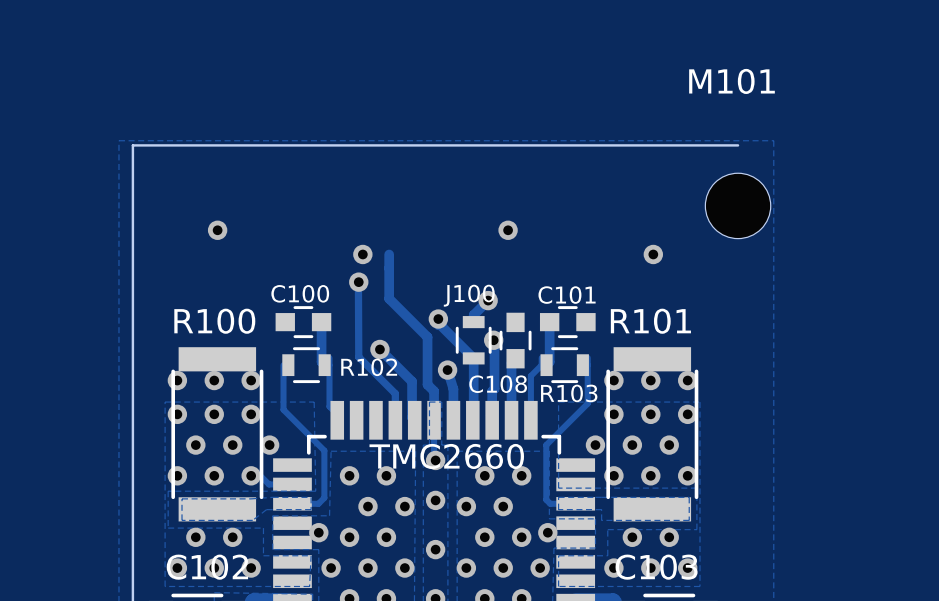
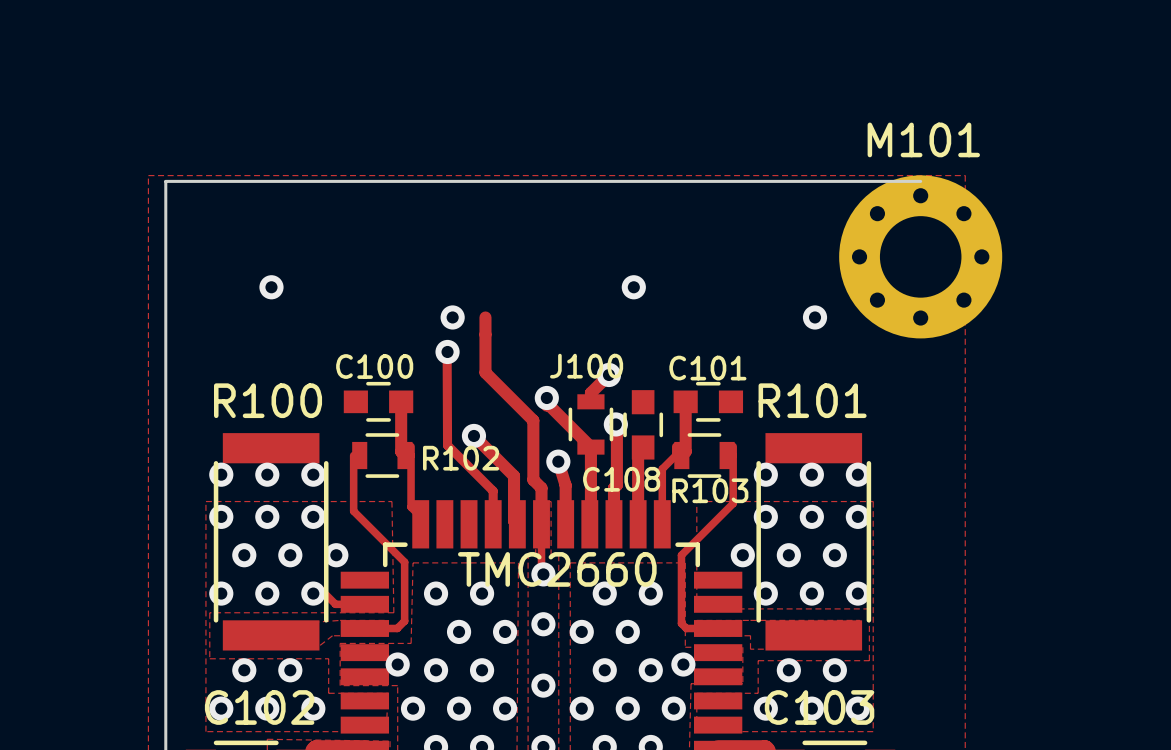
M101 footprint: [705, 173, 771, 239] -> [839, 175, 1003, 339]

